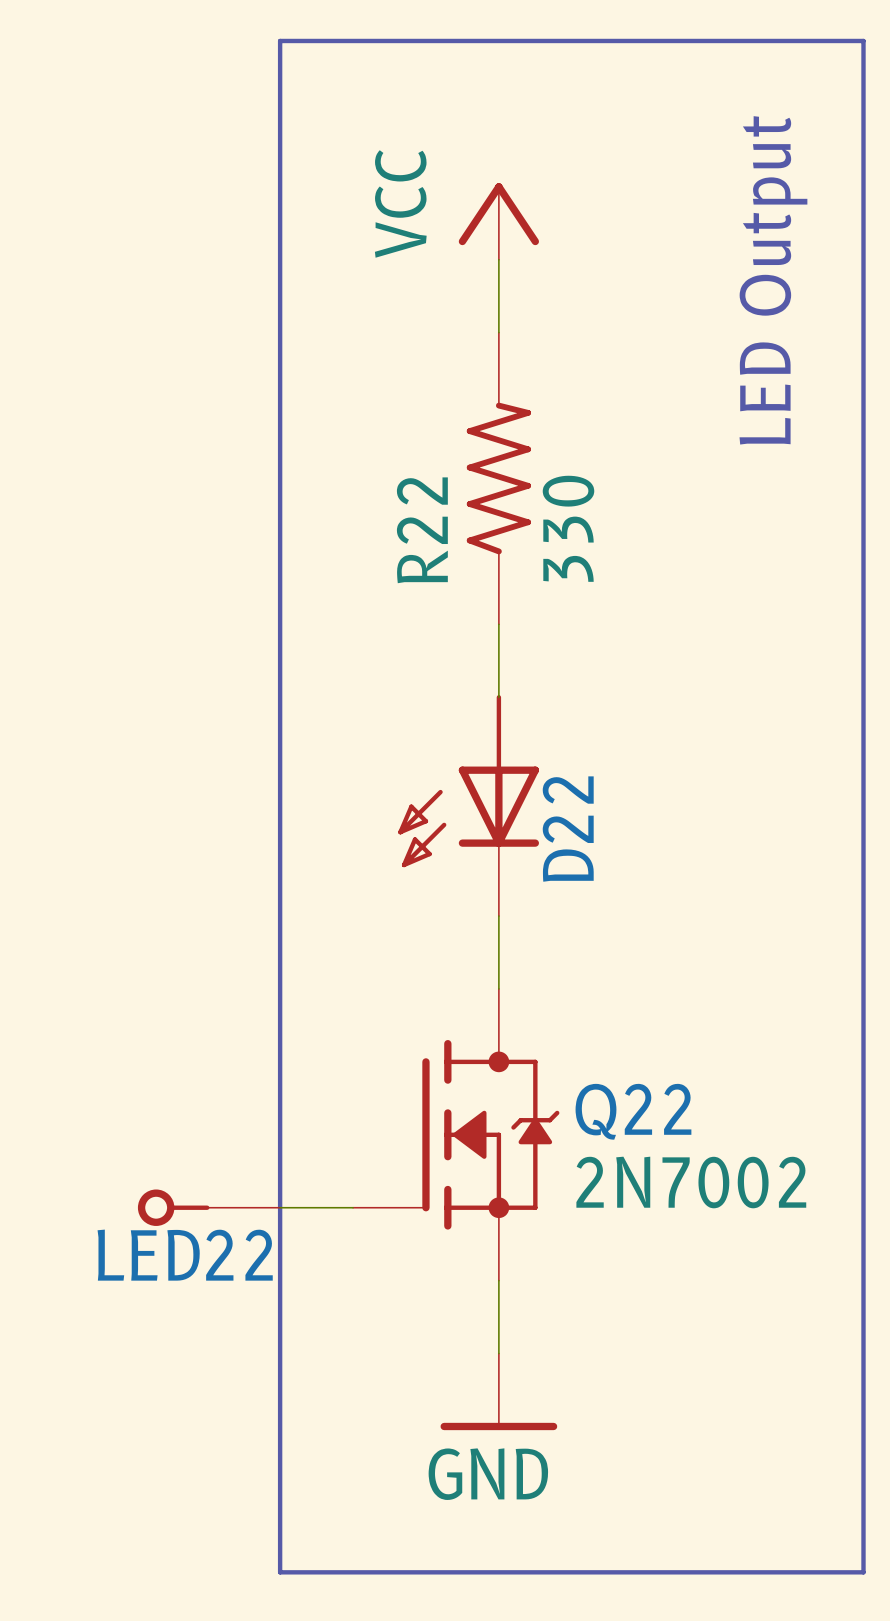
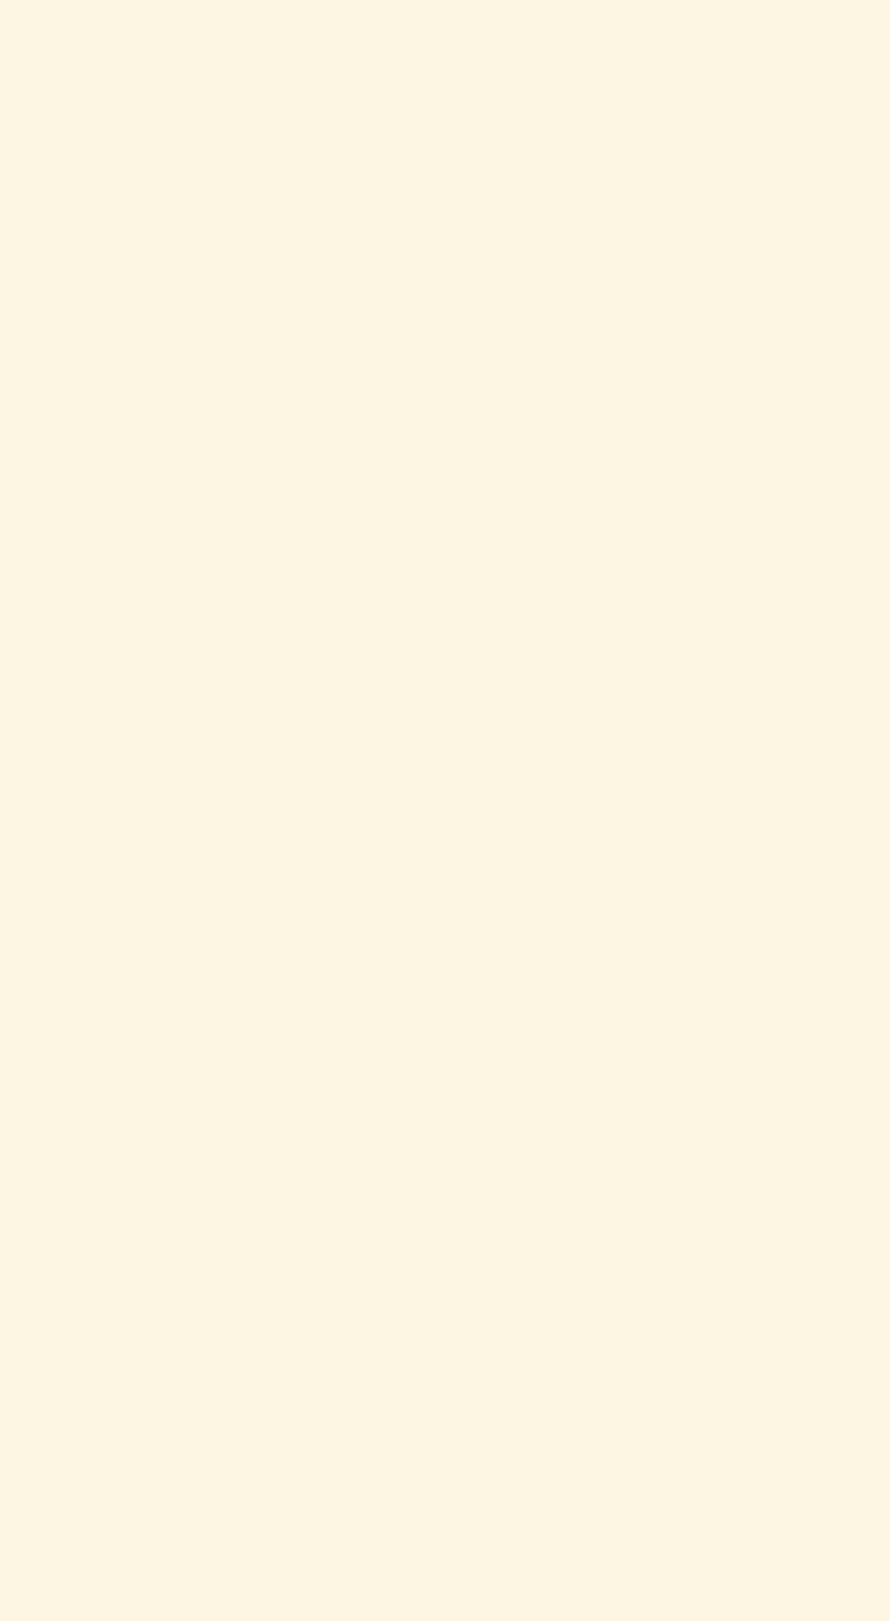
line: (280, 40) (863, 40) (863, 1572) (280, 1572) (280, 40) -> none
power symbol: VCC (498, 221) -> none
wire: (498, 259) (498, 332) -> none
text: LED Output (773, 280) -> none
R22: 330 (498, 478) -> none
wire: (498, 624) (498, 697) -> none
D22: (468, 805) -> none
wire: (498, 916) (498, 988) -> none
Q22: 2N7002 (456, 1134) -> none
LED22: (209, 1207) -> none
wire: (280, 1207) (353, 1207) -> none
wire: (498, 1280) (498, 1353) -> none
power symbol: GND (498, 1391) -> none

